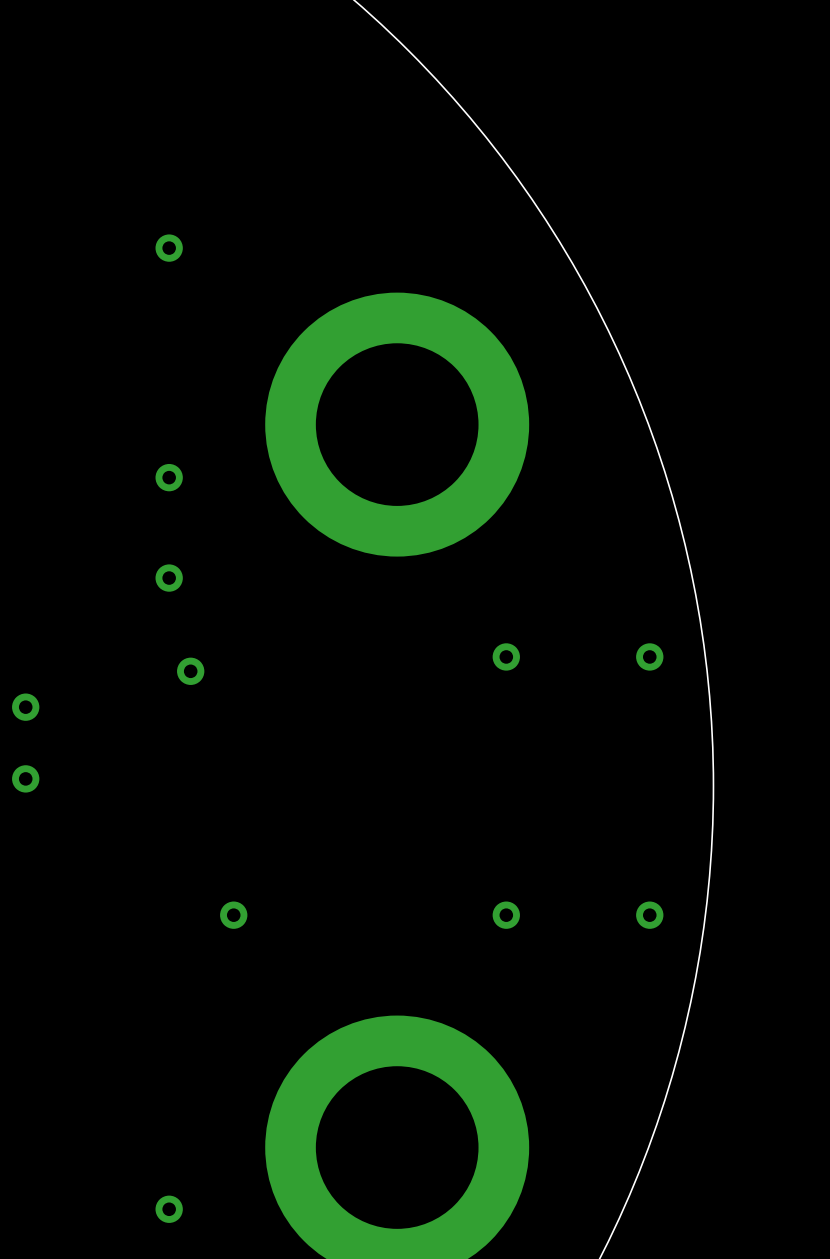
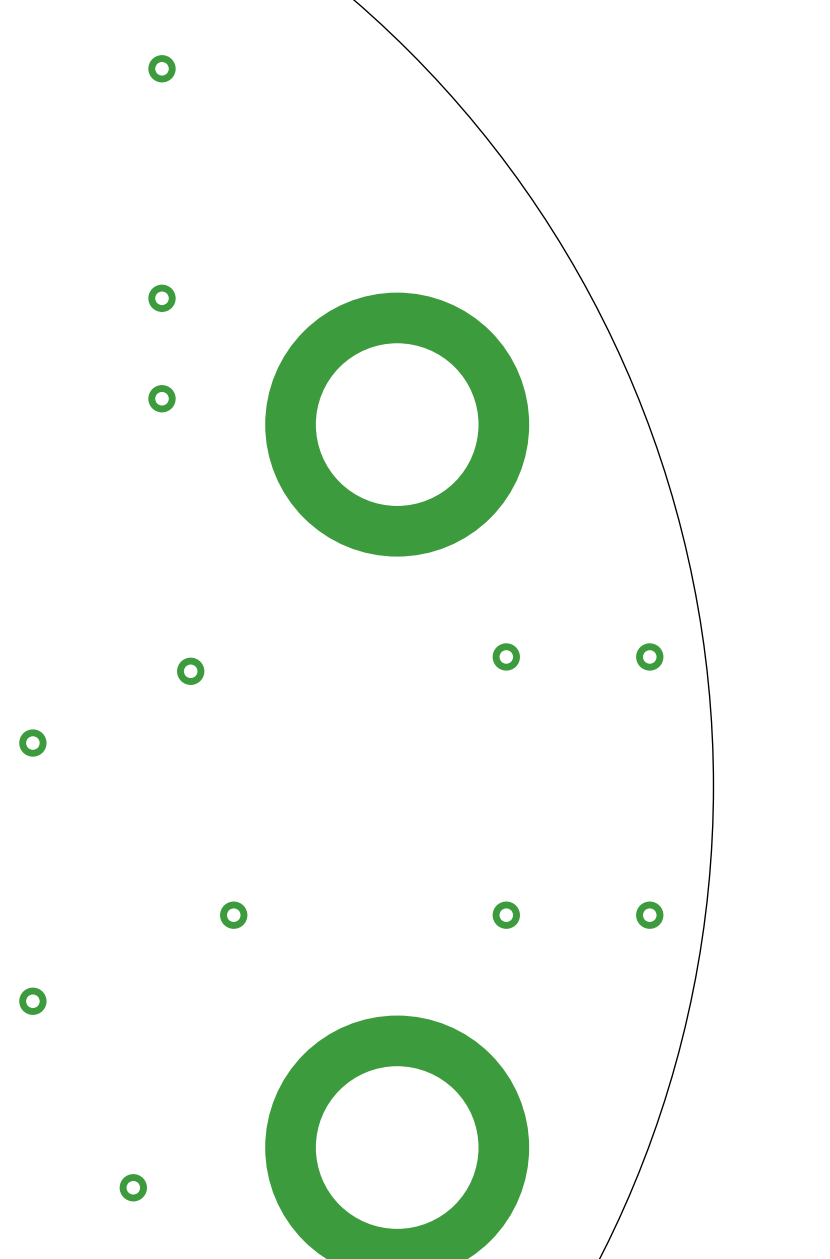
via: none -> (162, 68)
via position: (169, 248) -> (162, 298)
via: none -> (162, 398)
via: (169, 477) -> none
via: (169, 578) -> none
via: (25, 707) -> none
via: none -> (32, 743)
via: (25, 778) -> none
via: none -> (32, 1001)
via position: (169, 1209) -> (133, 1187)

